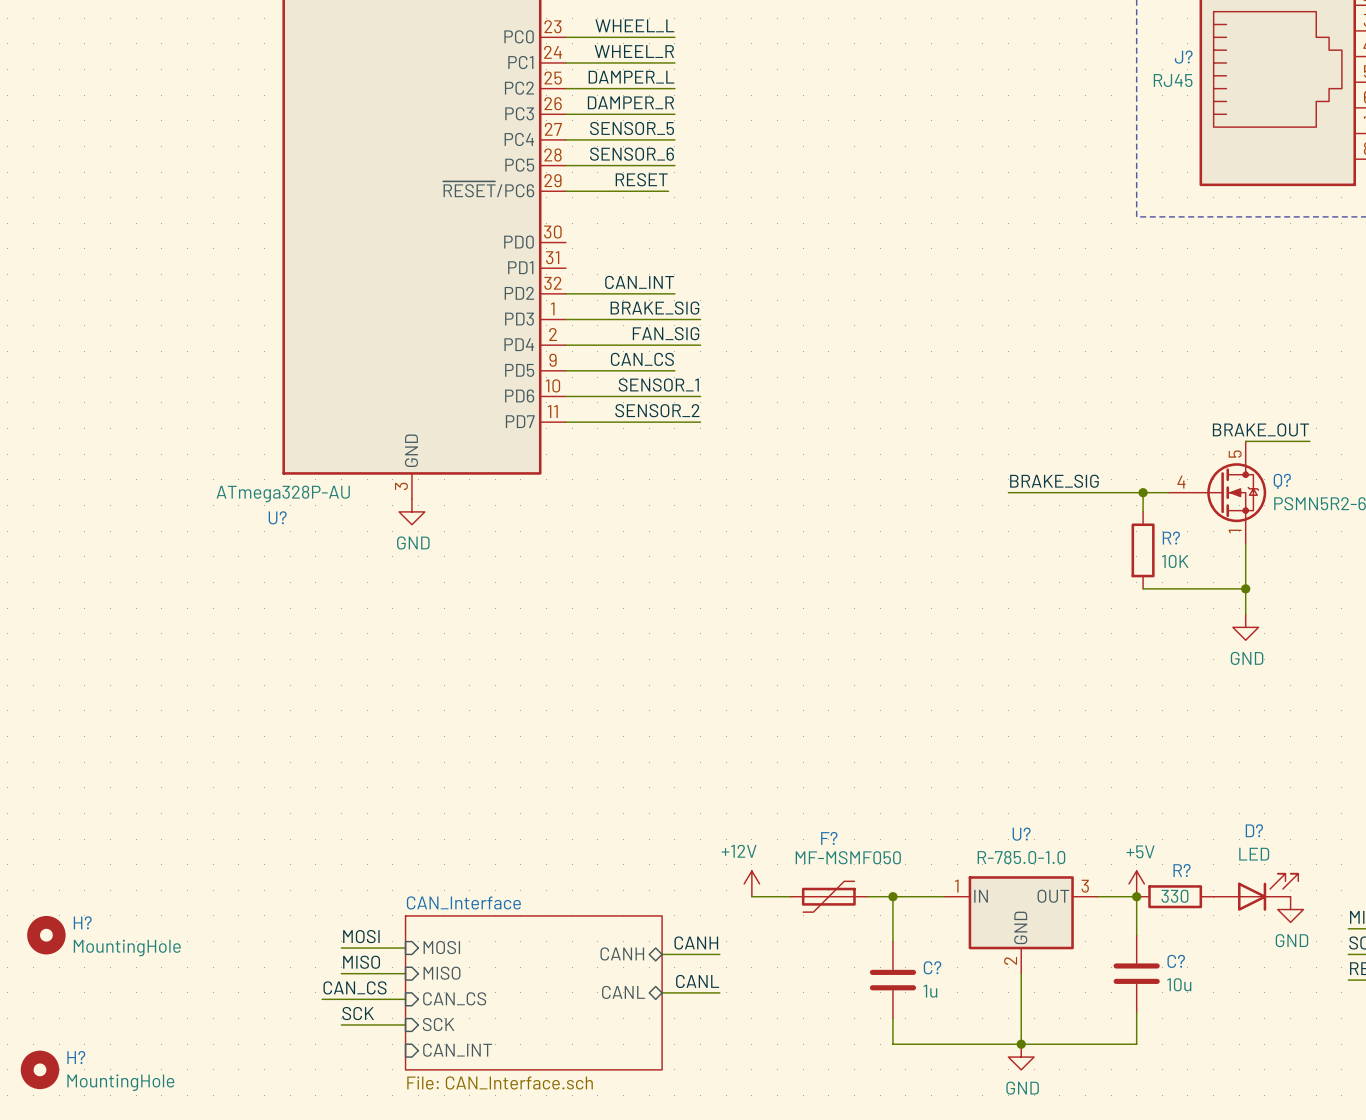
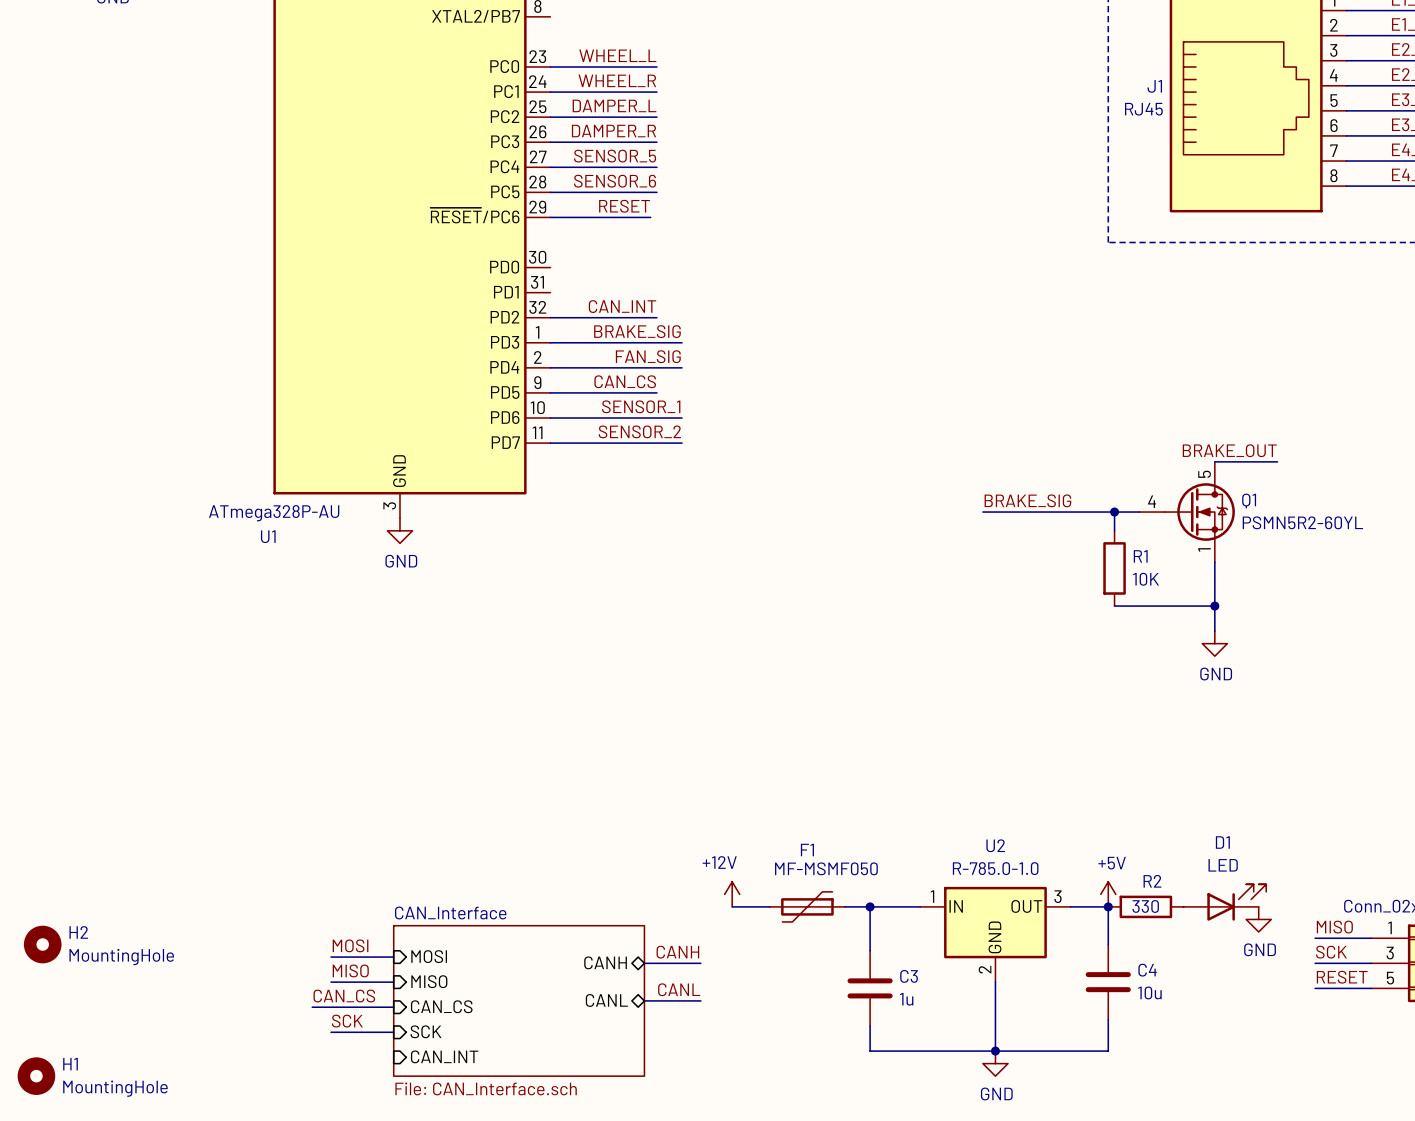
J? name: J? (1183, 57) -> J1 (1154, 86)
Q? name: Q? (1282, 481) -> Q1 (1249, 500)
U? name: U? (277, 517) -> U1 (268, 536)
R? name: R? (1171, 538) -> R1 (1140, 556)
D? name: D? (1254, 830) -> D1 (1222, 842)
U? name: U? (1021, 834) -> U2 (995, 845)
F? name: F? (829, 838) -> F1 (807, 850)
R? name: R? (1182, 870) -> R2 (1152, 881)
H? name: H? (82, 922) -> H2 (78, 932)
C? name: C? (1176, 961) -> C4 (1147, 970)
C? name: C? (932, 967) -> C3 (909, 976)
H? name: H? (76, 1057) -> H1 (70, 1064)

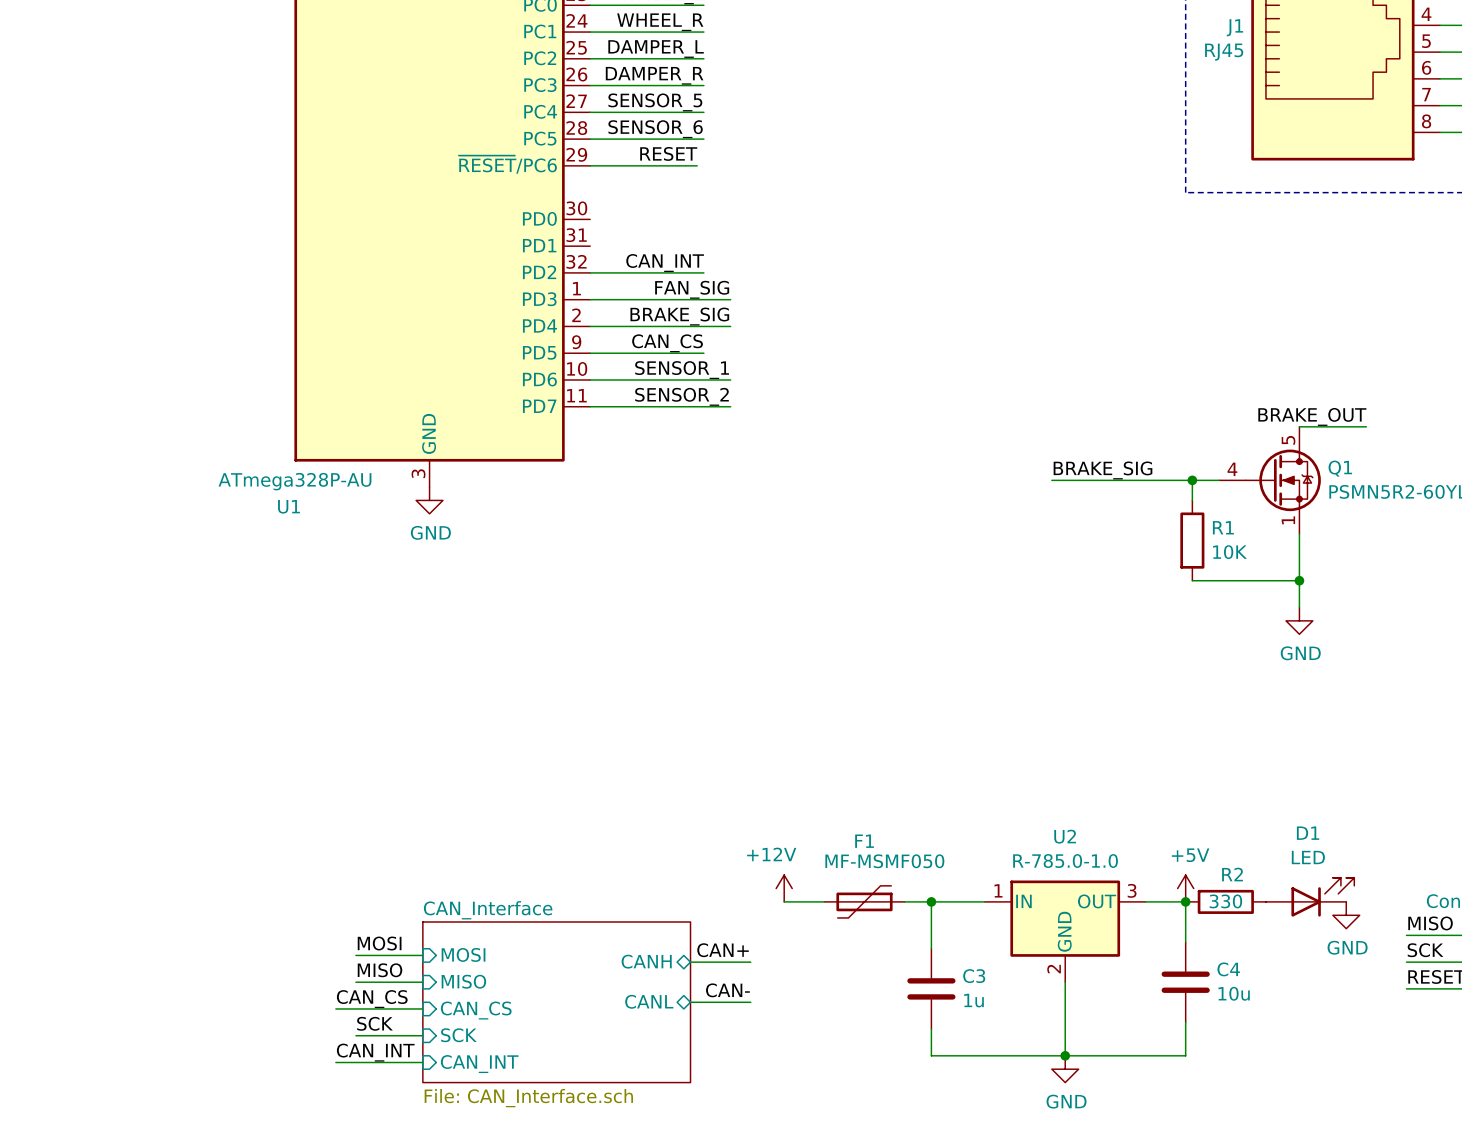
label: BRAKE_SIG (637, 331) -> FAN_SIG (692, 289)
label: FAN_SIG (648, 356) -> BRAKE_SIG (679, 316)
H2: MountingHole (42, 944) -> none
label: CANH (677, 952) -> CAN+ (723, 950)
label: CANL (679, 989) -> CAN- (727, 990)
label: none -> CAN_INT (375, 1052)
wire: none -> (335, 1062) (422, 1062)
H1: MountingHole (36, 1076) -> none

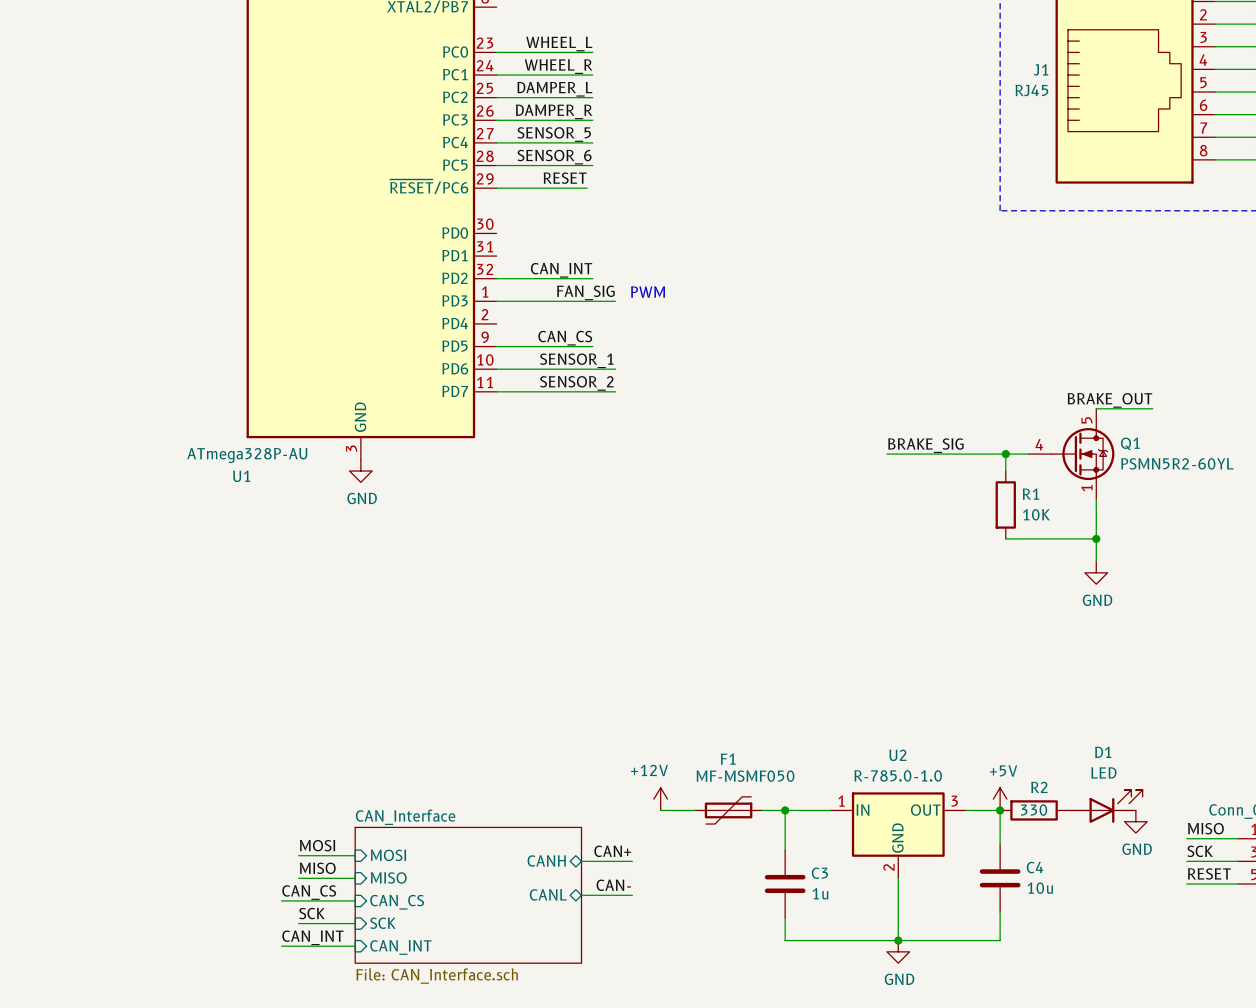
text: none -> PWM (647, 292)
label: BRAKE_SIG (679, 316) -> none
wire: (590, 326) (730, 326) -> none

